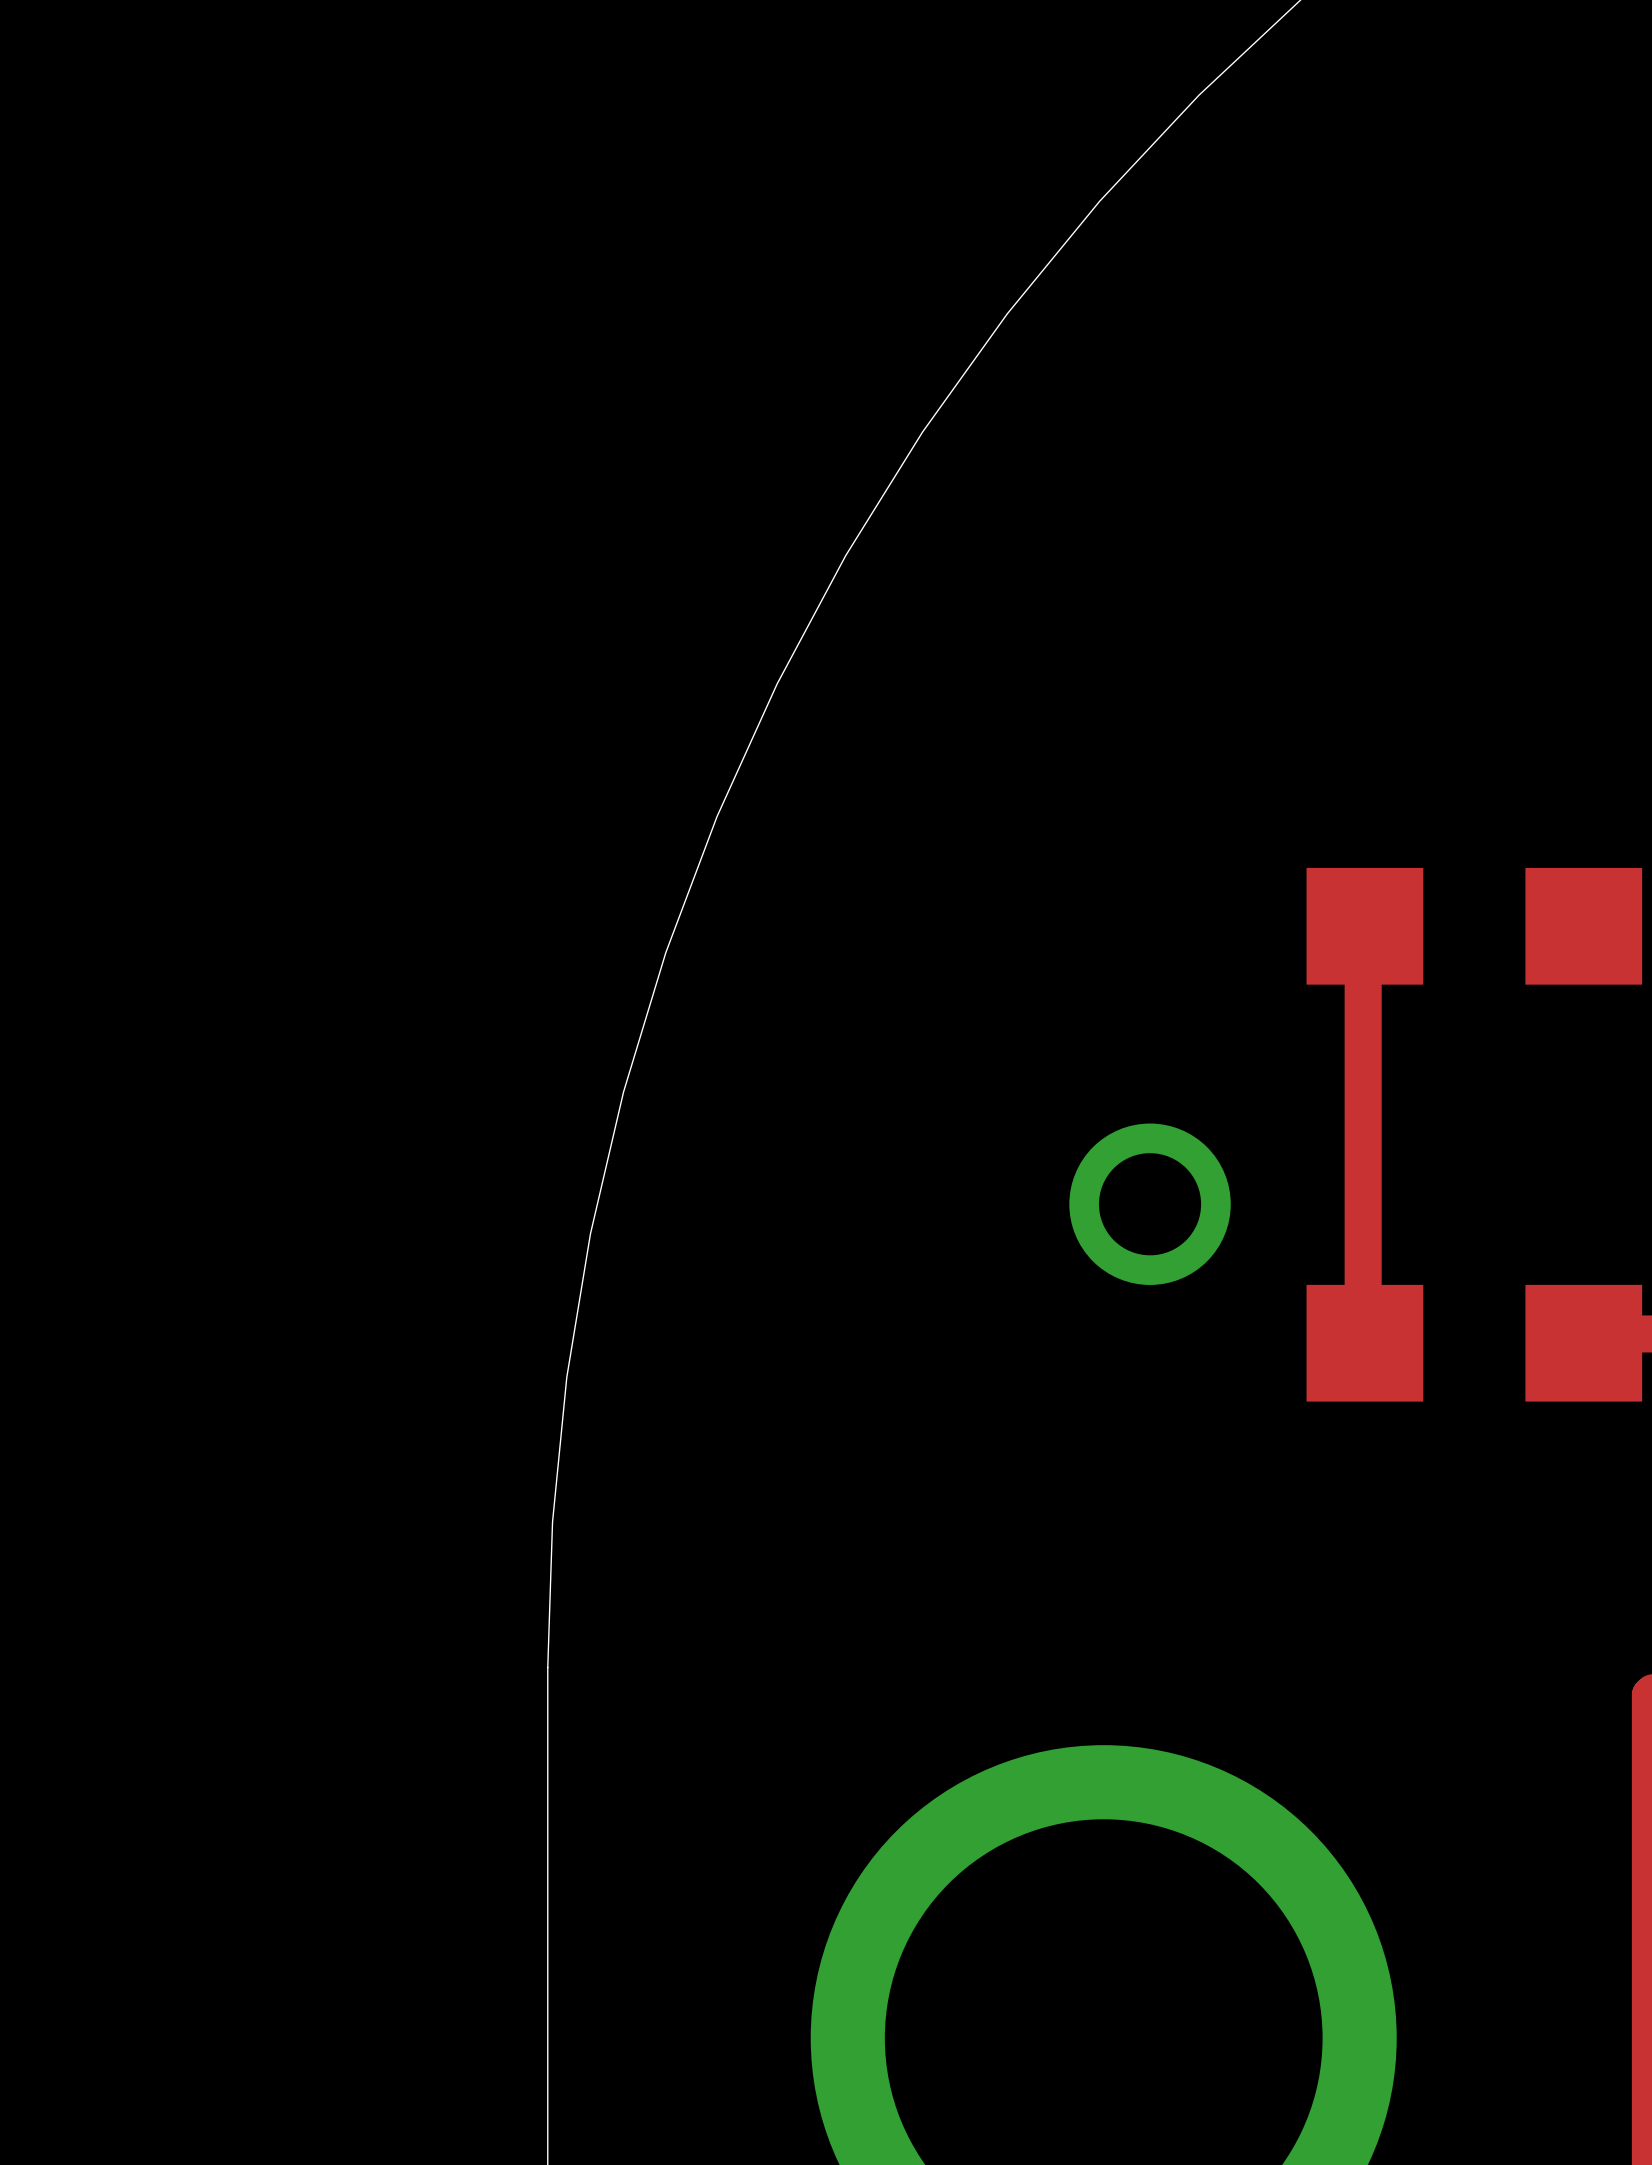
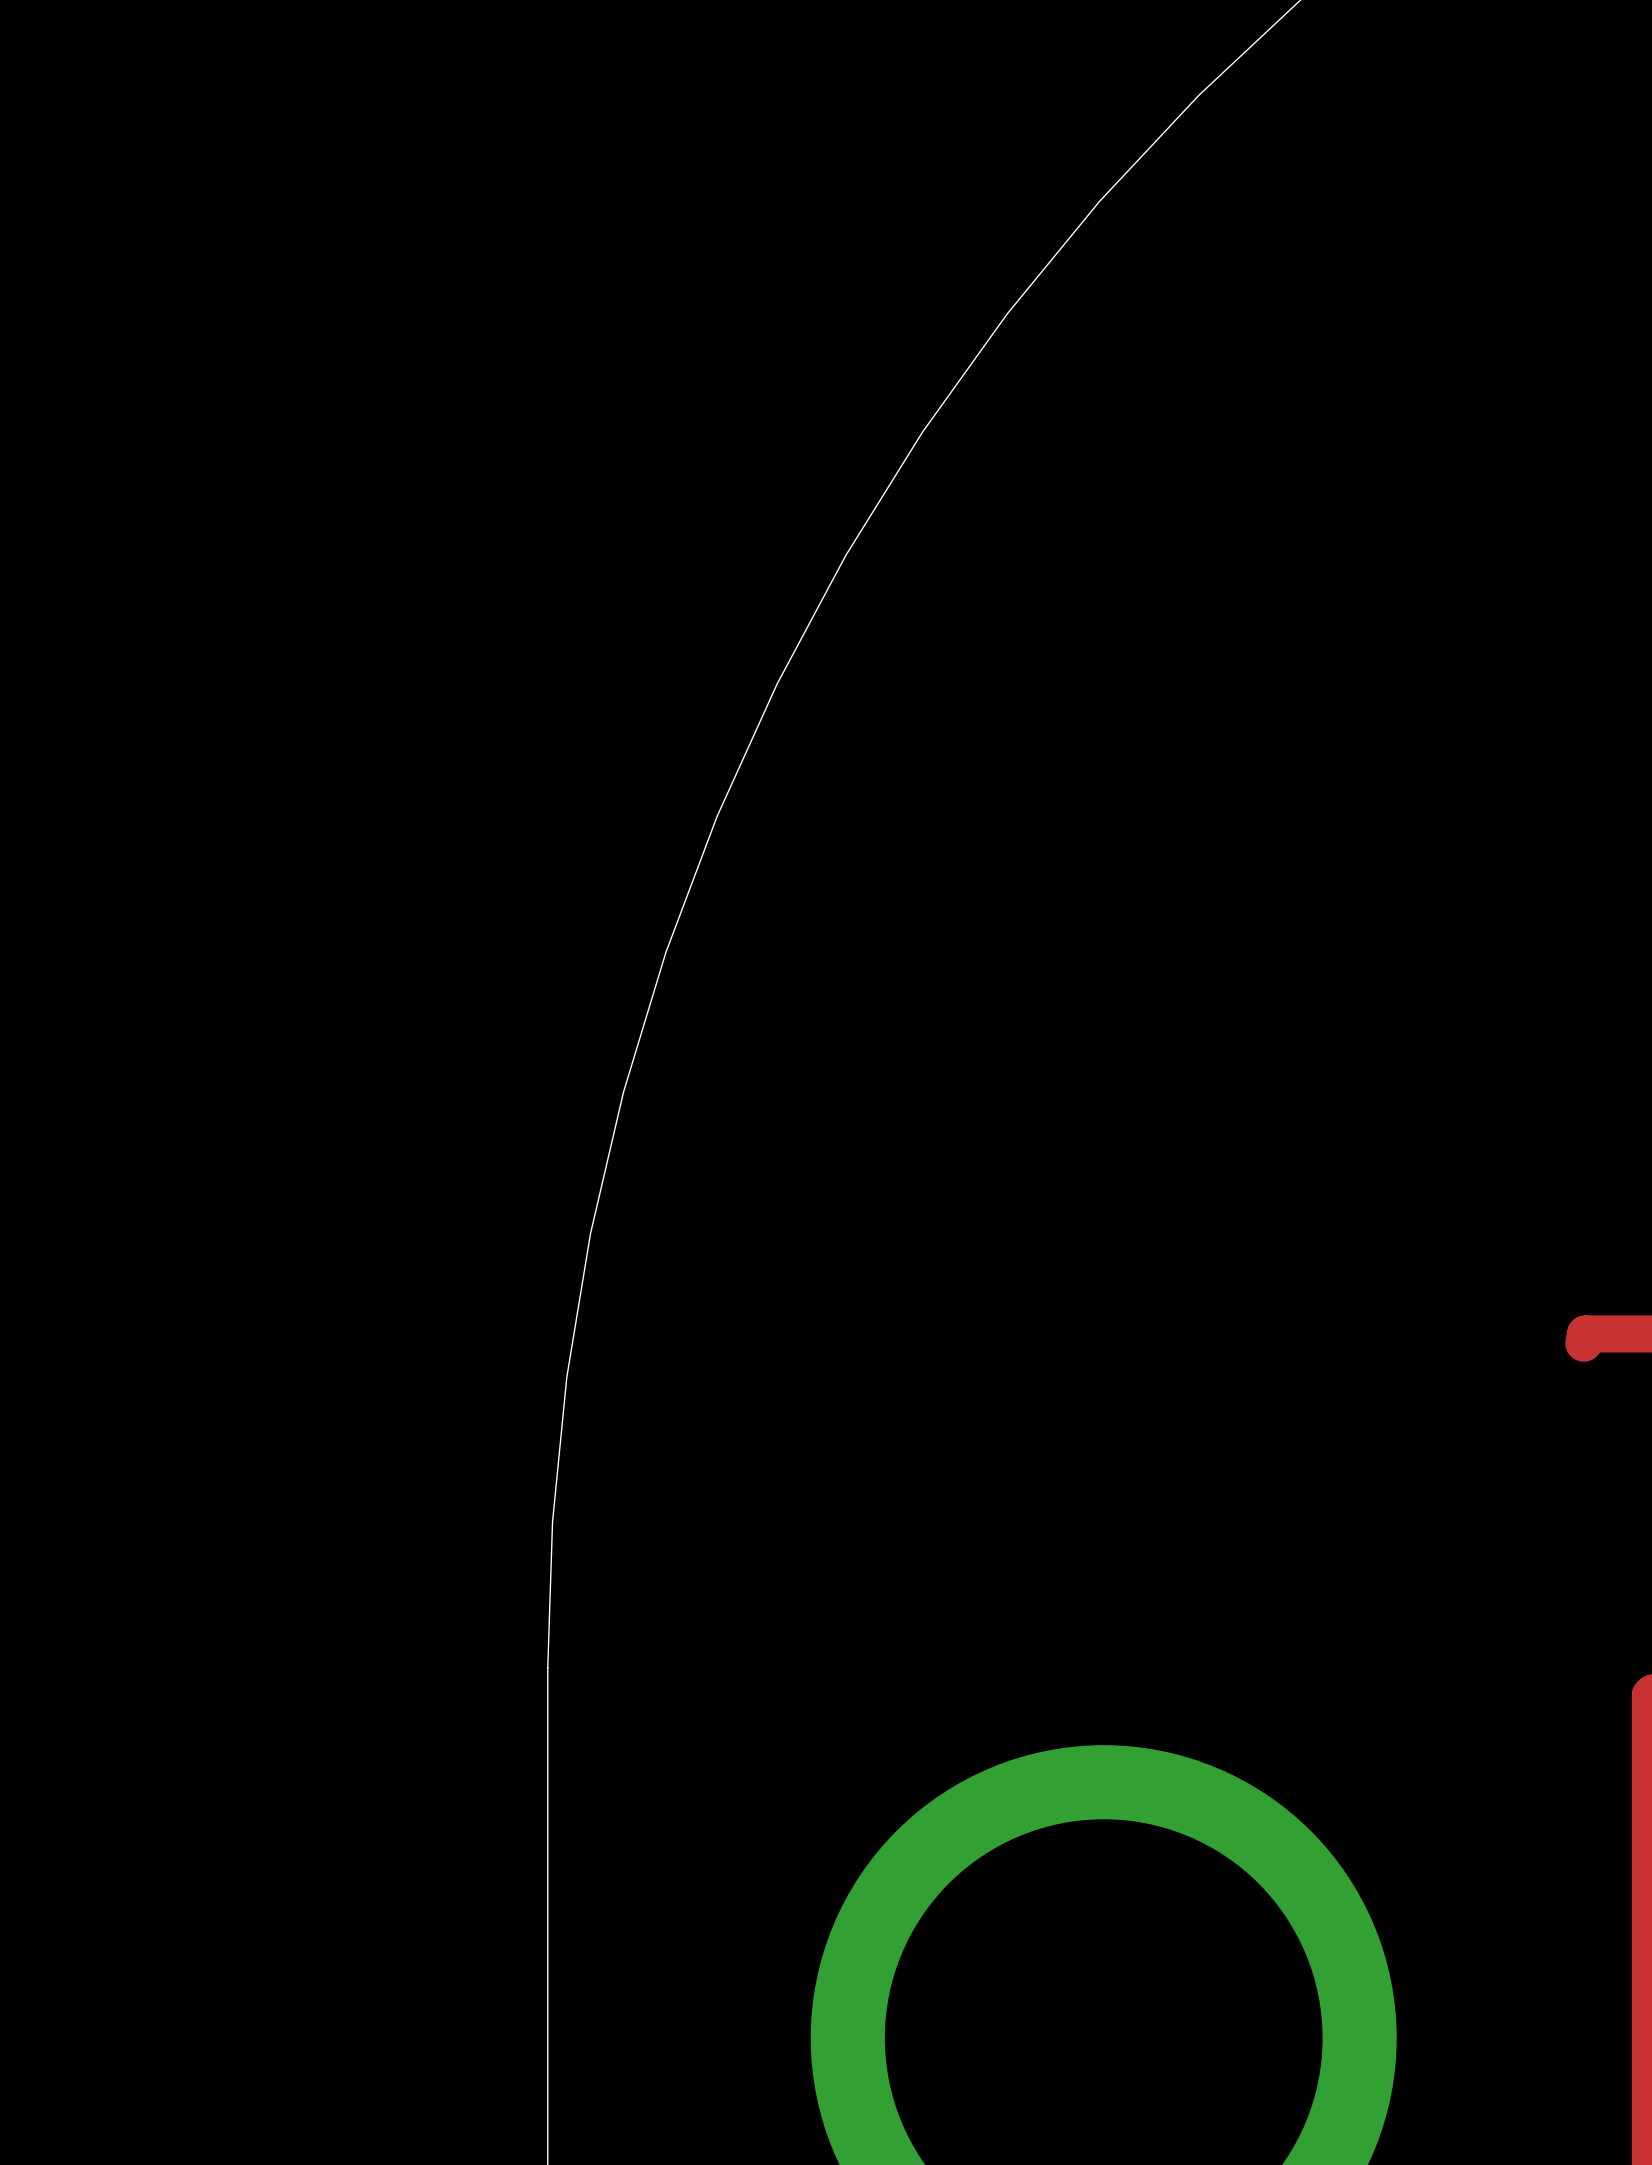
top track: (1364, 926) (1363, 972) (1363, 1380) (1364, 1343) -> none
part: (1474, 926) -> none
via: (1150, 1204) -> none
part: (1474, 1343) -> none

